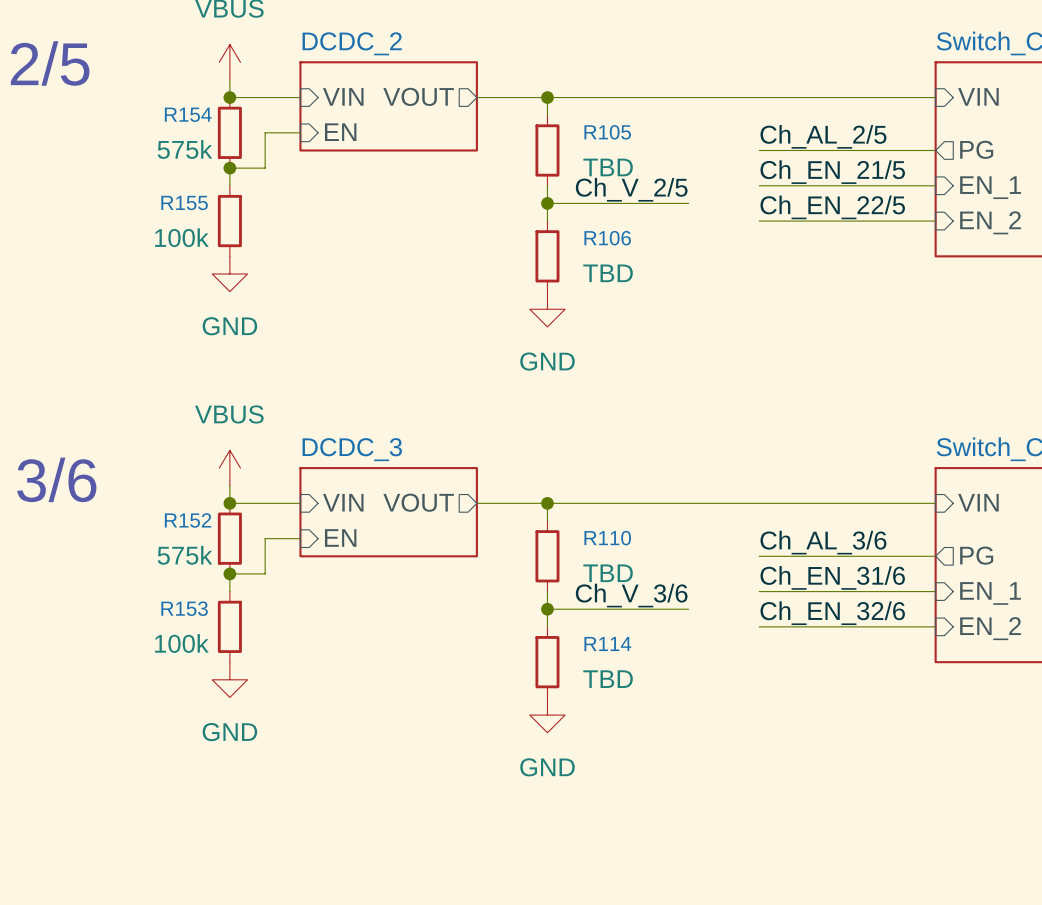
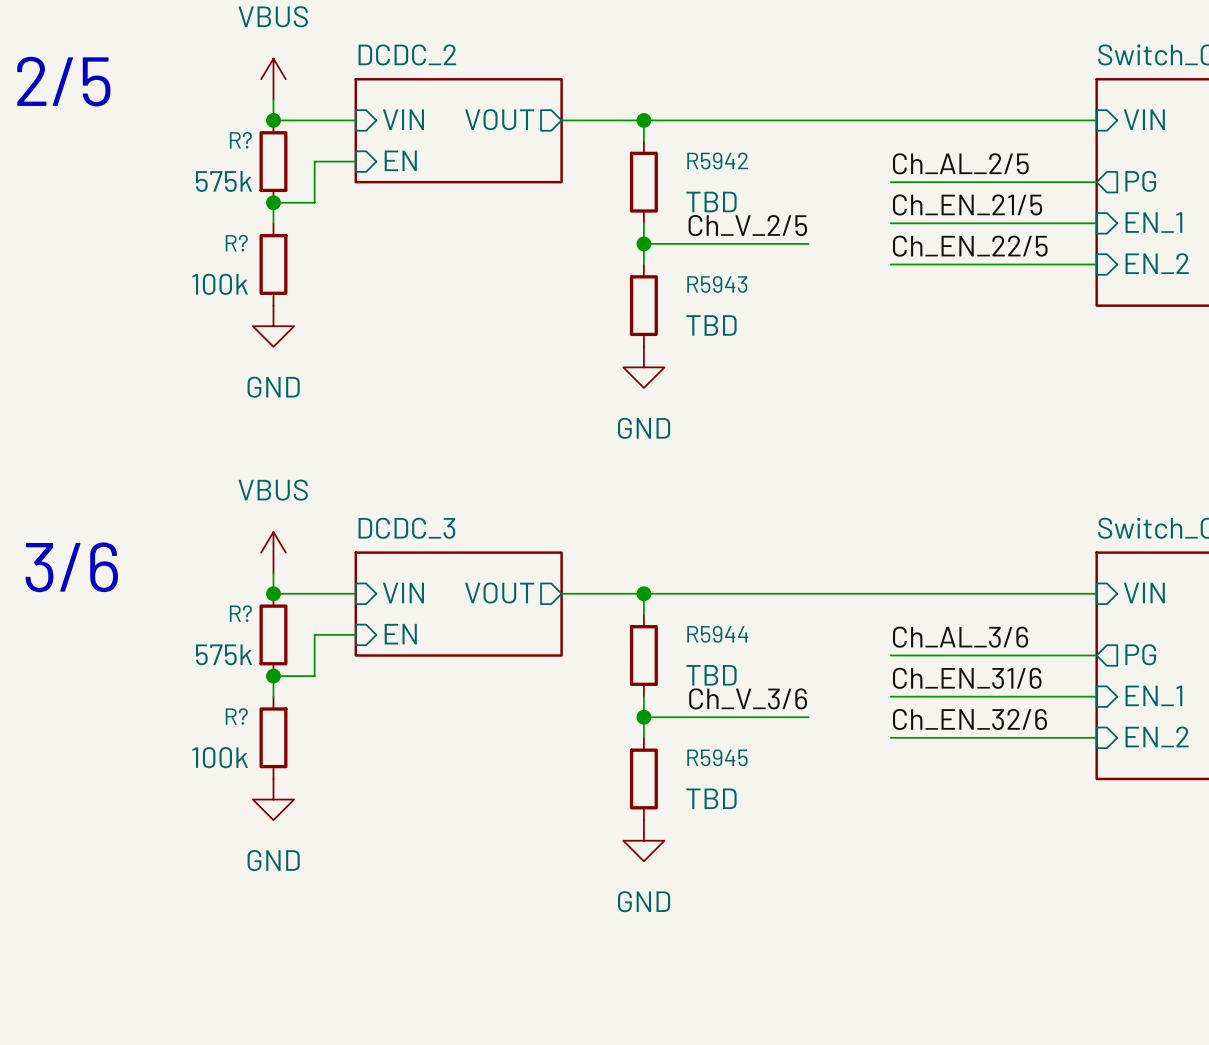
R154 name: R154 (188, 114) -> R? (240, 140)
R105 name: R105 (607, 132) -> R5942 (717, 160)
R155 name: R155 (184, 202) -> R? (236, 243)
R106 name: R106 (607, 238) -> R5943 (717, 284)
R152 name: R152 (188, 520) -> R? (240, 613)
R110 name: R110 (607, 538) -> R5944 (717, 634)
R153 name: R153 (184, 608) -> R? (236, 716)
R114 name: R114 (607, 643) -> R5945 (717, 757)

